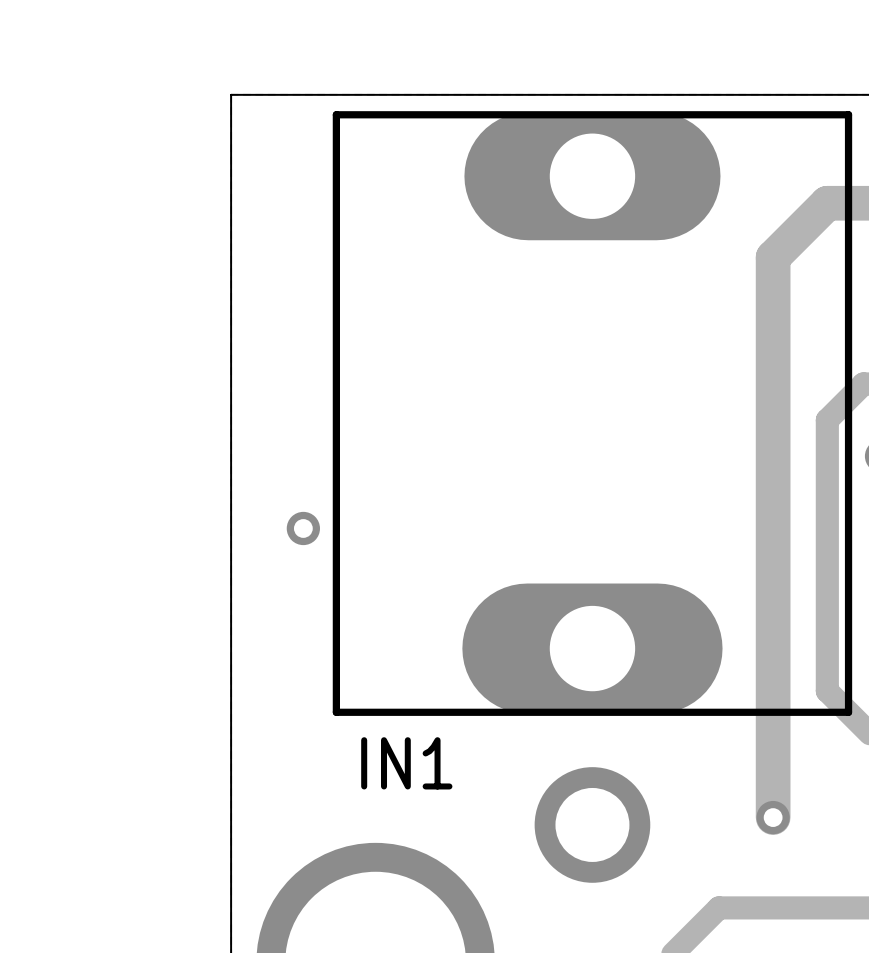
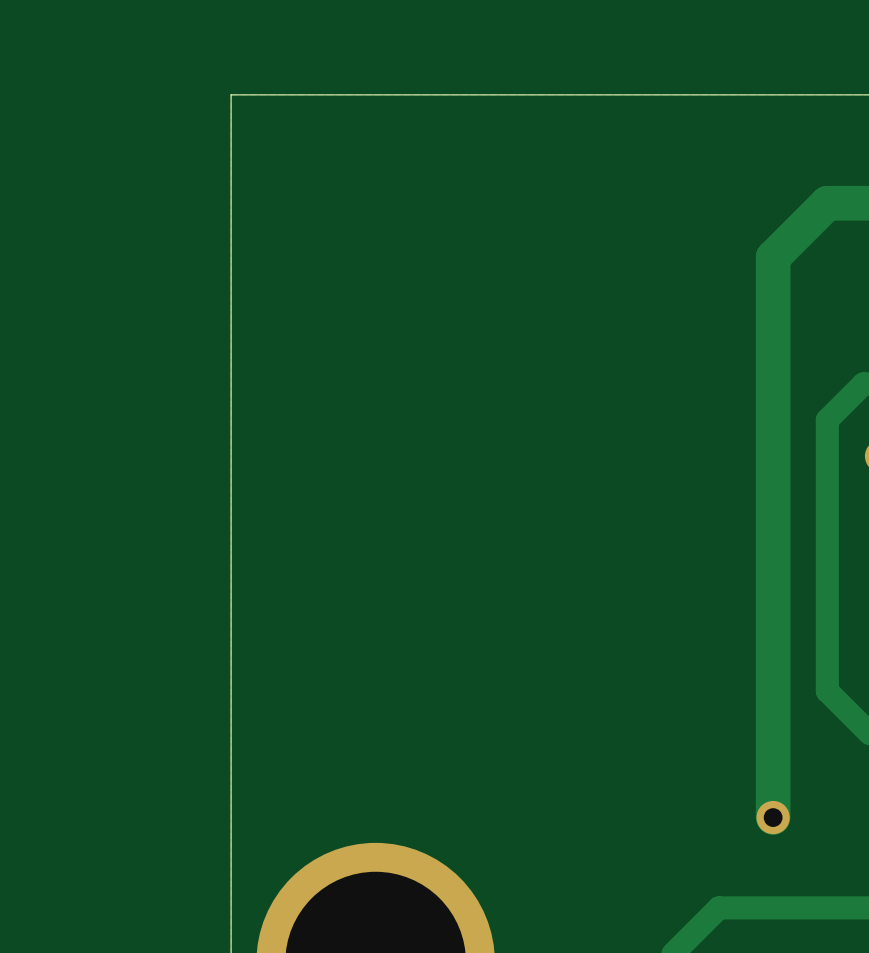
IN1: (592, 496) -> none
via: (303, 528) -> none

